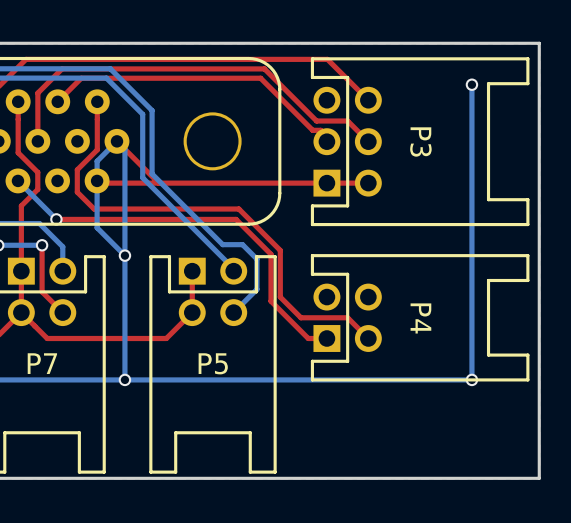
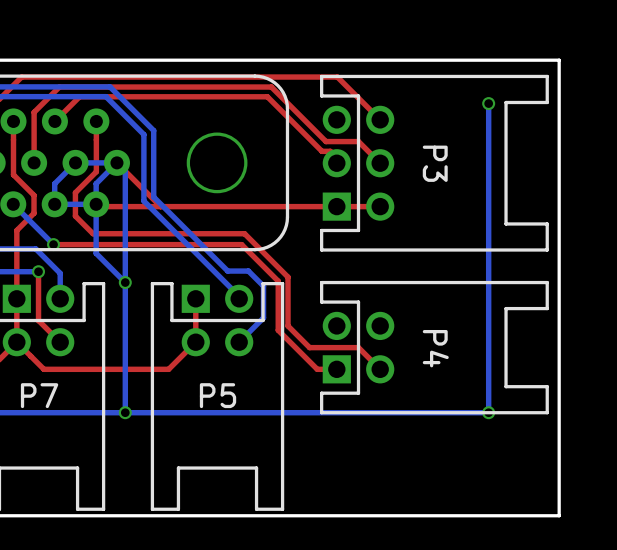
bottom track: none -> (116, 162) (75, 162) (54, 183) (54, 204) (96, 204)

